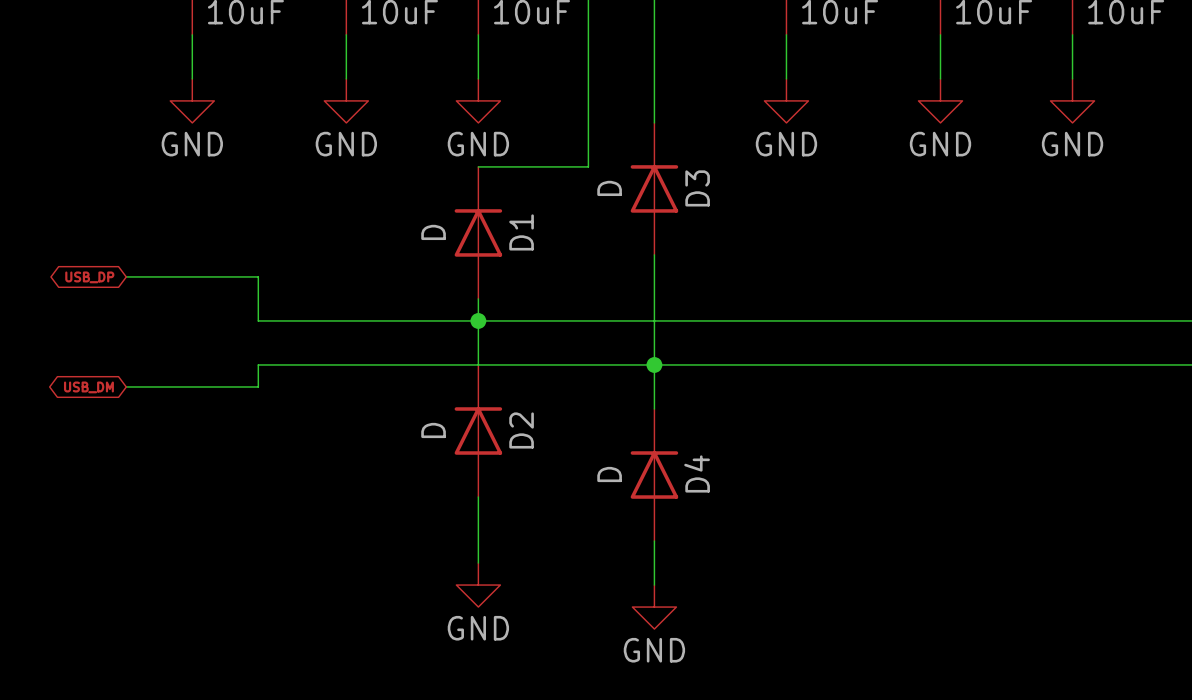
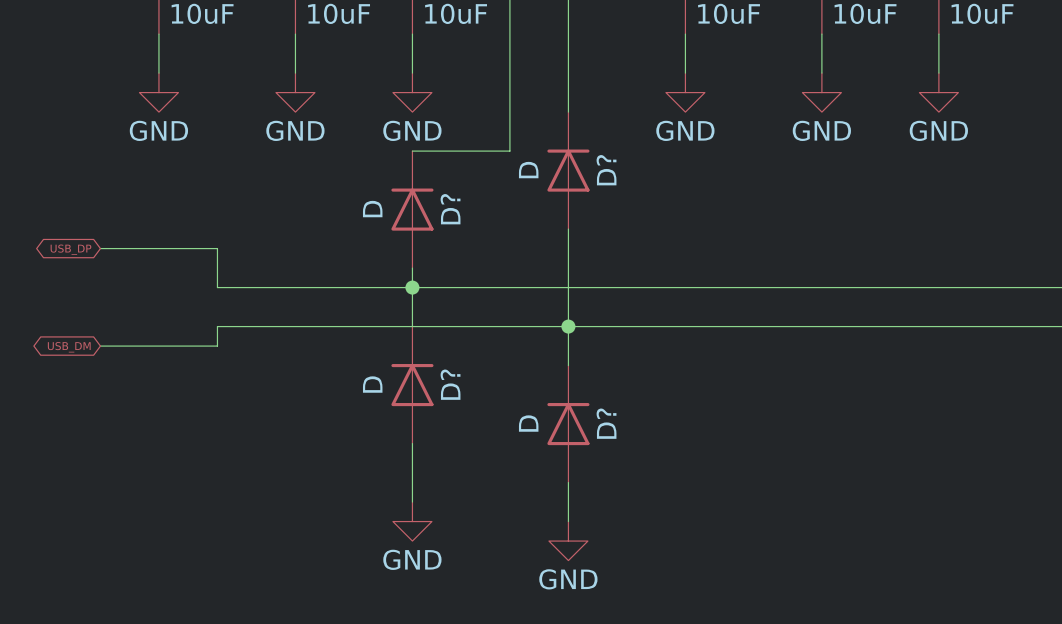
D3 name: D3 (697, 188) -> D? (606, 170)
D1 name: D1 (521, 232) -> D? (450, 209)
D2 name: D2 (521, 430) -> D? (450, 384)
D4 name: D4 (697, 473) -> D? (606, 423)

